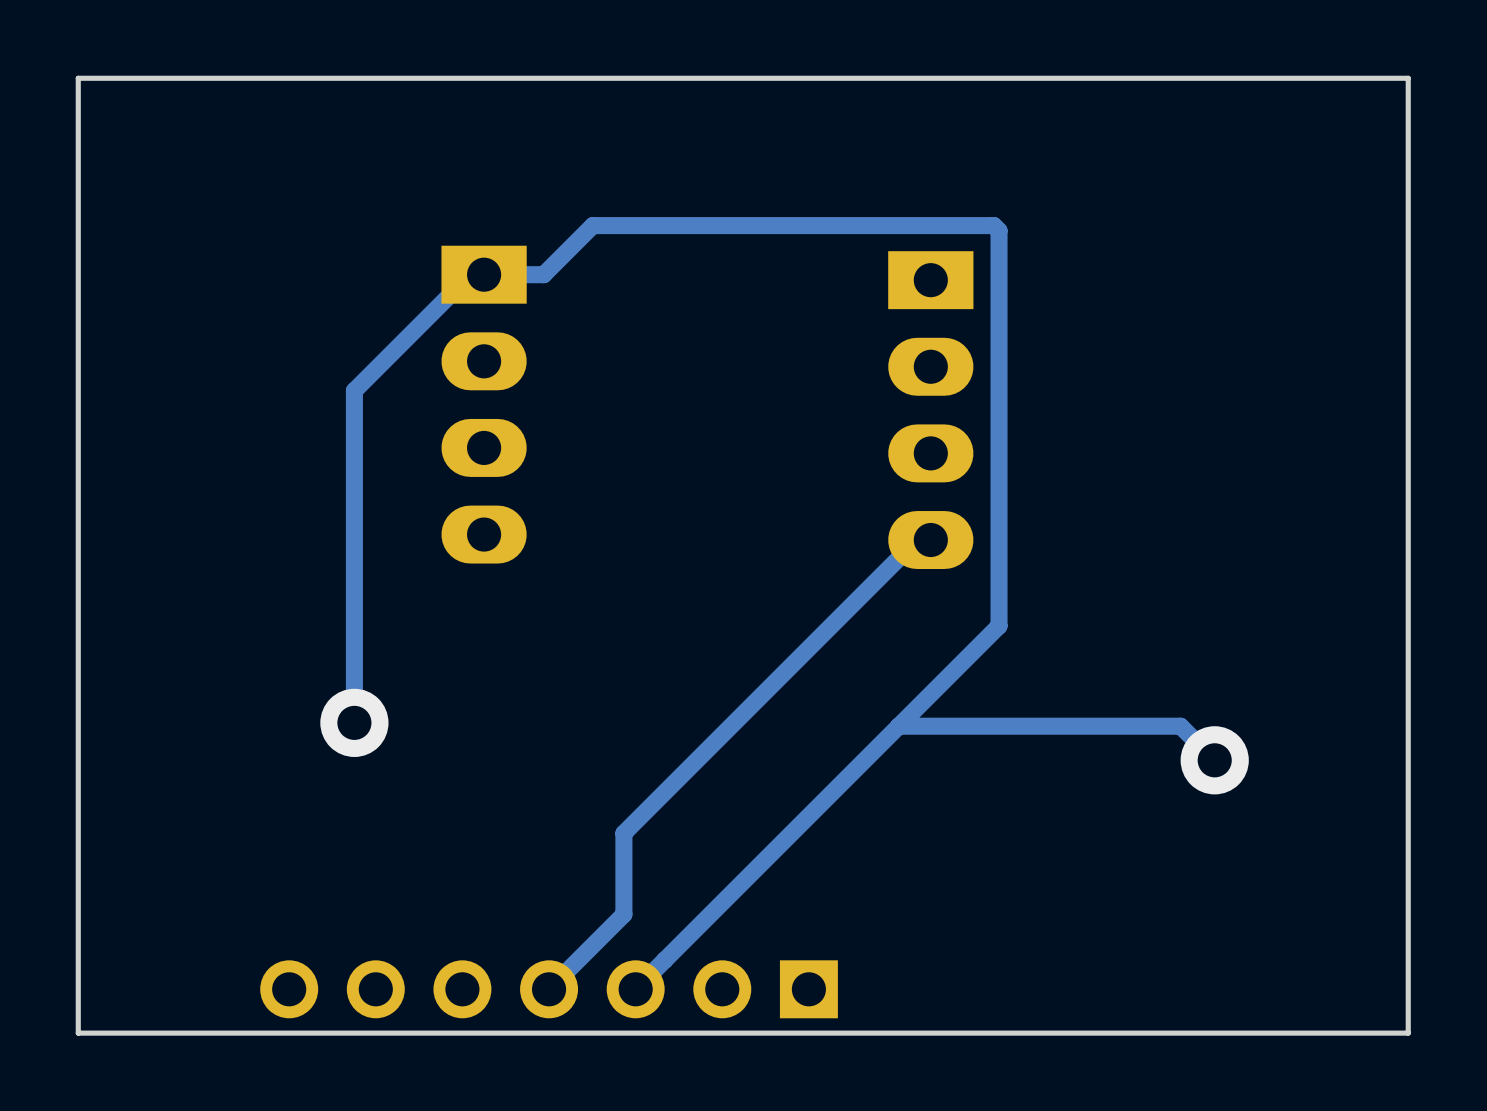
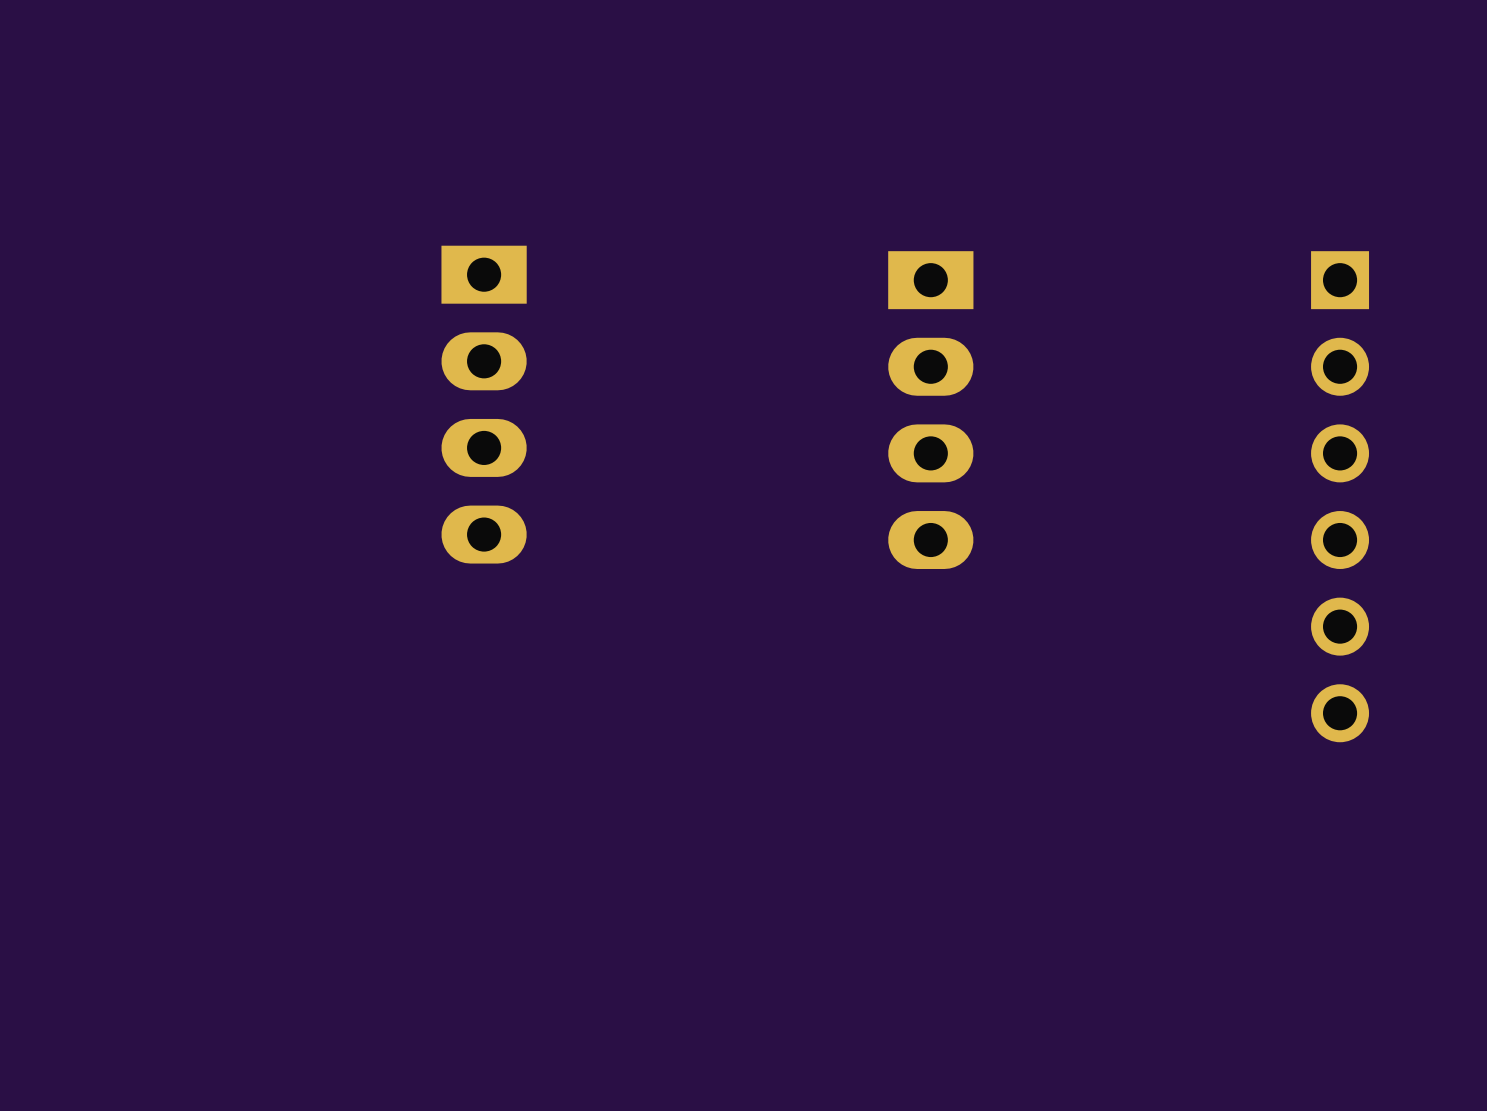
board edge: (1408, 78) (78, 78) (78, 1033) (1408, 1033) (1408, 78) -> none
part: none -> (1340, 496)
track: (930, 540) (917, 540) (623, 833) (623, 914) (549, 989) -> none
track: (354, 722) (354, 390) (470, 274) (543, 274) (592, 225) (993, 225) (999, 230) (999, 625) (635, 989) -> none
via: (354, 722) -> none
track: (898, 726) (1180, 726) (1214, 760) -> none
via: (1214, 760) -> none
part: (549, 989) -> none

